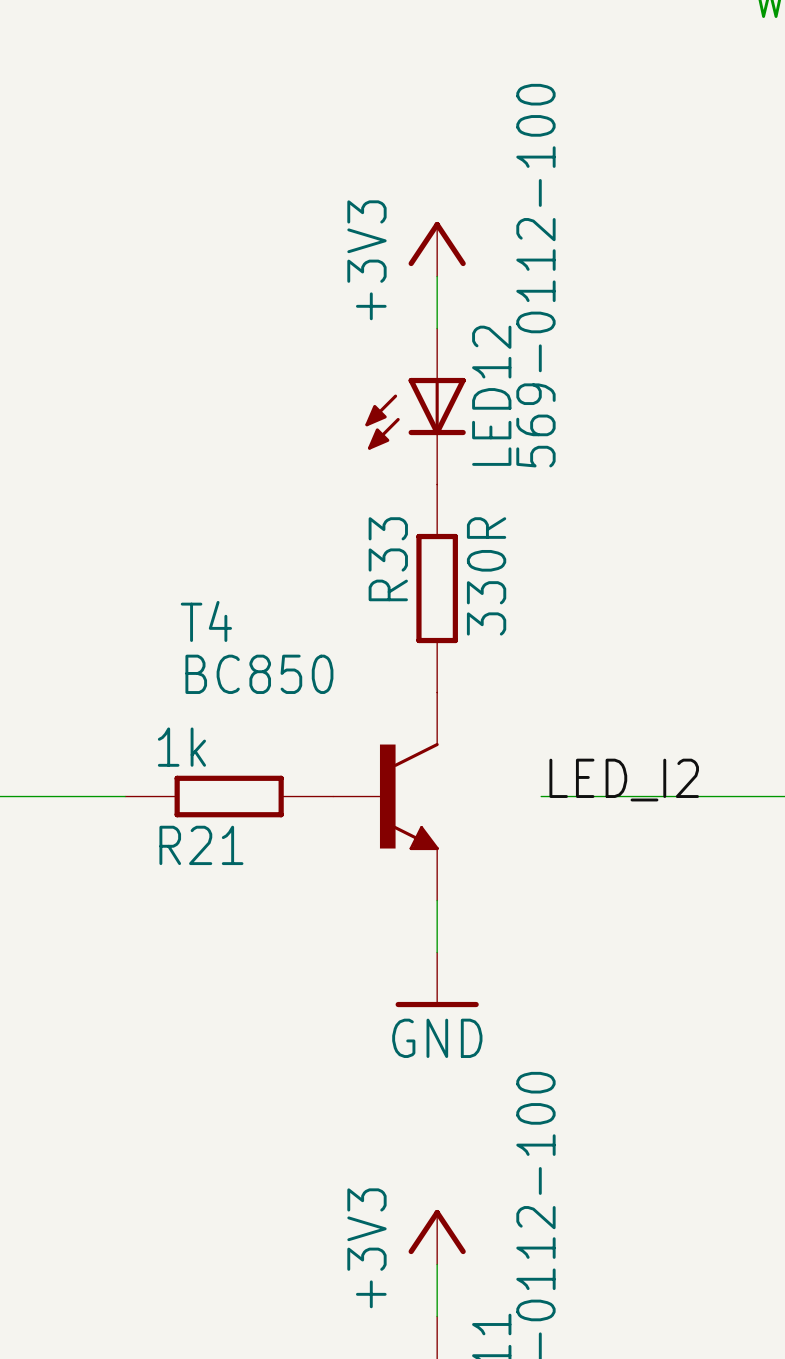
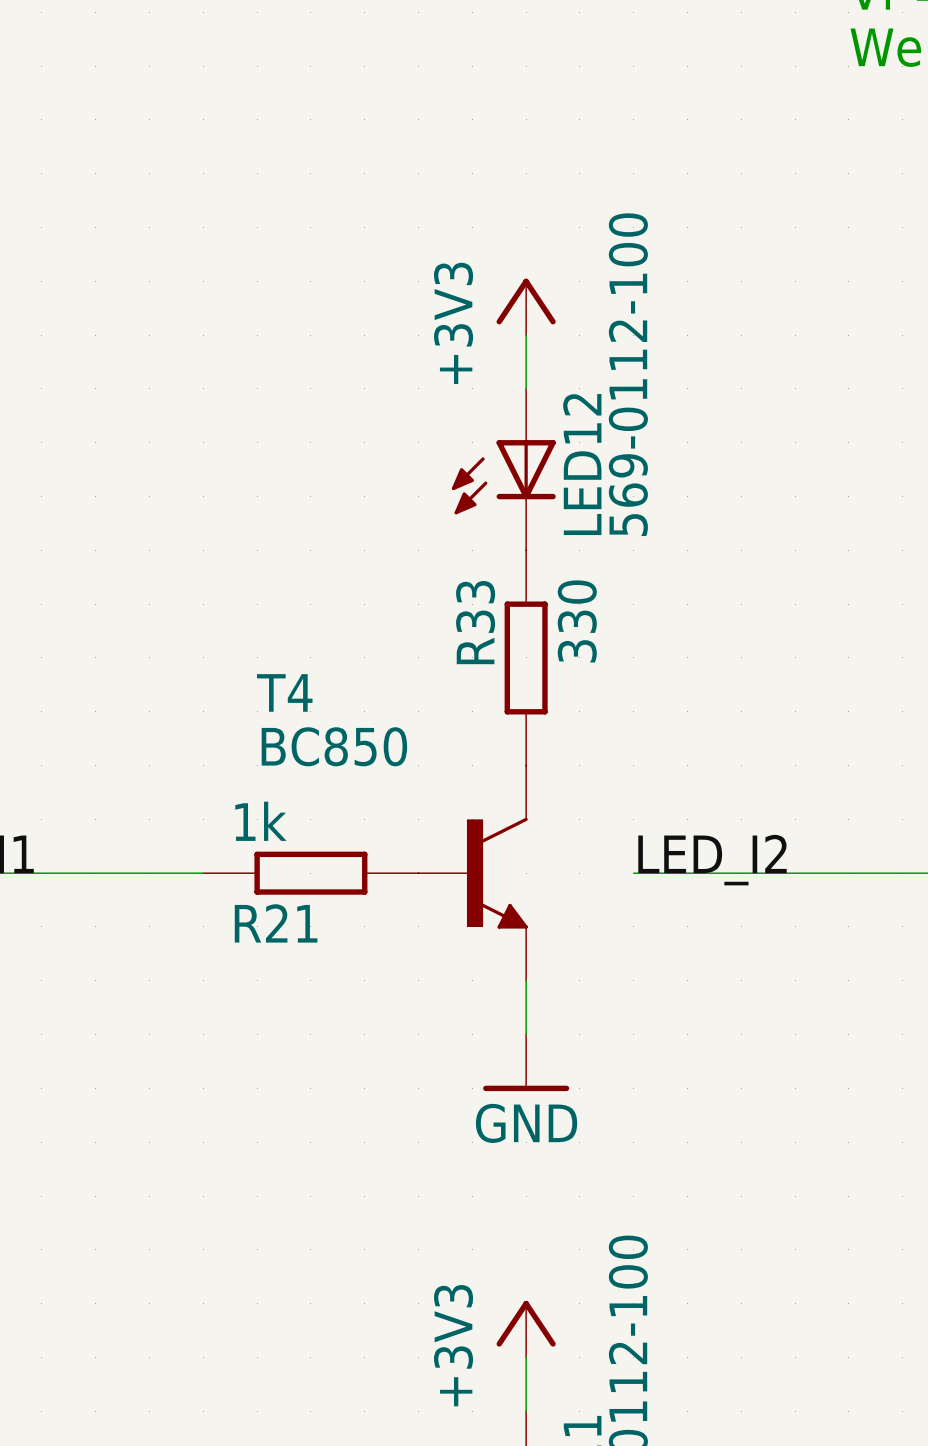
R33 value: 330R (486, 576) -> 330 (577, 621)

